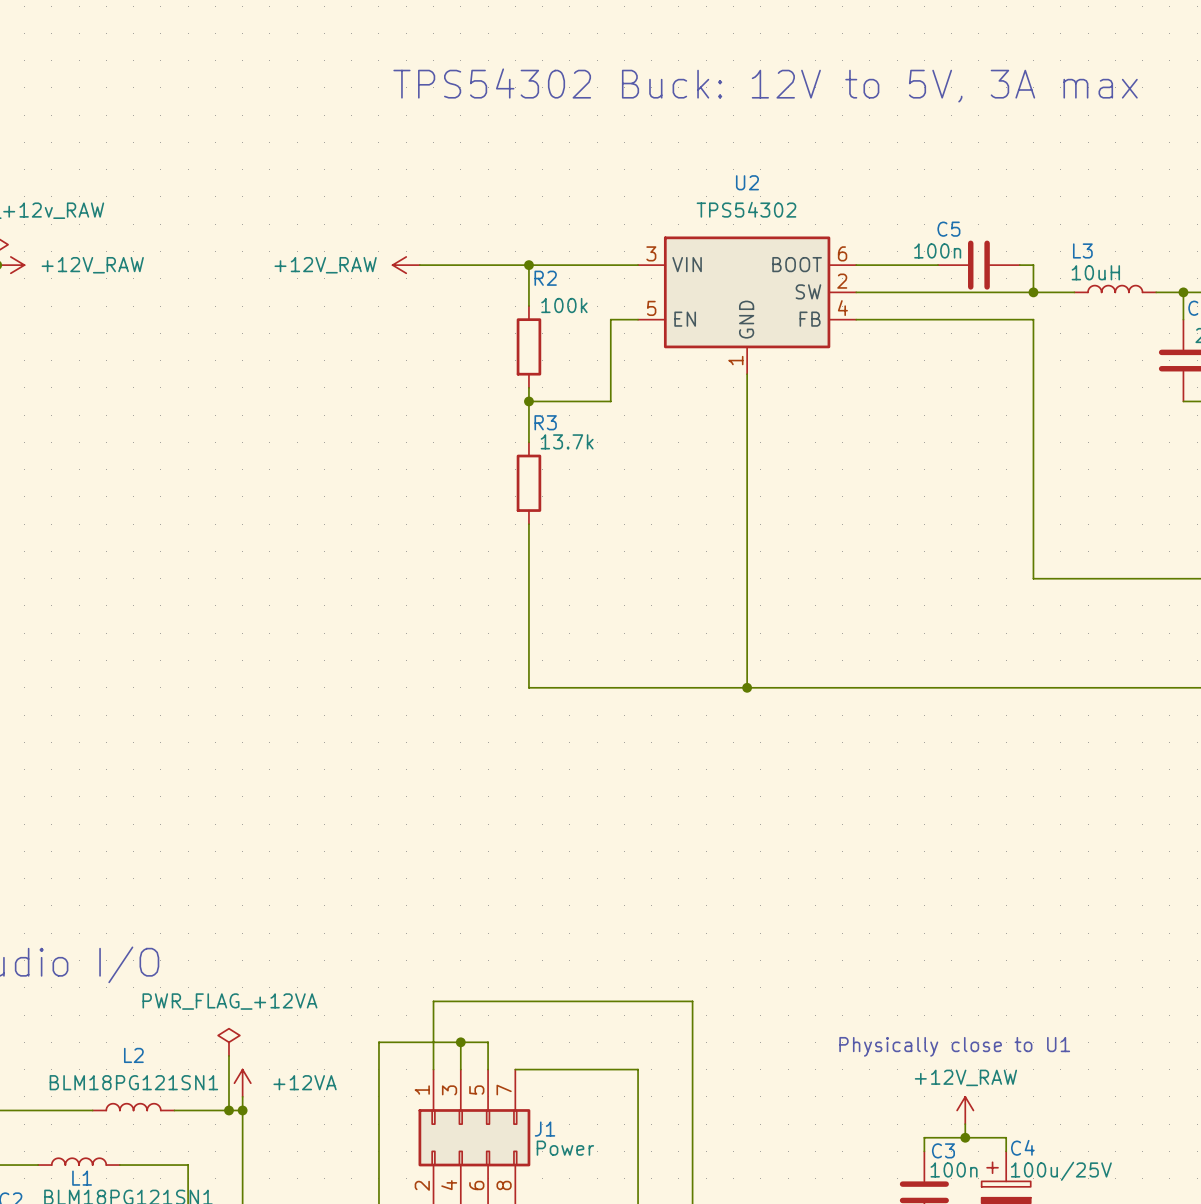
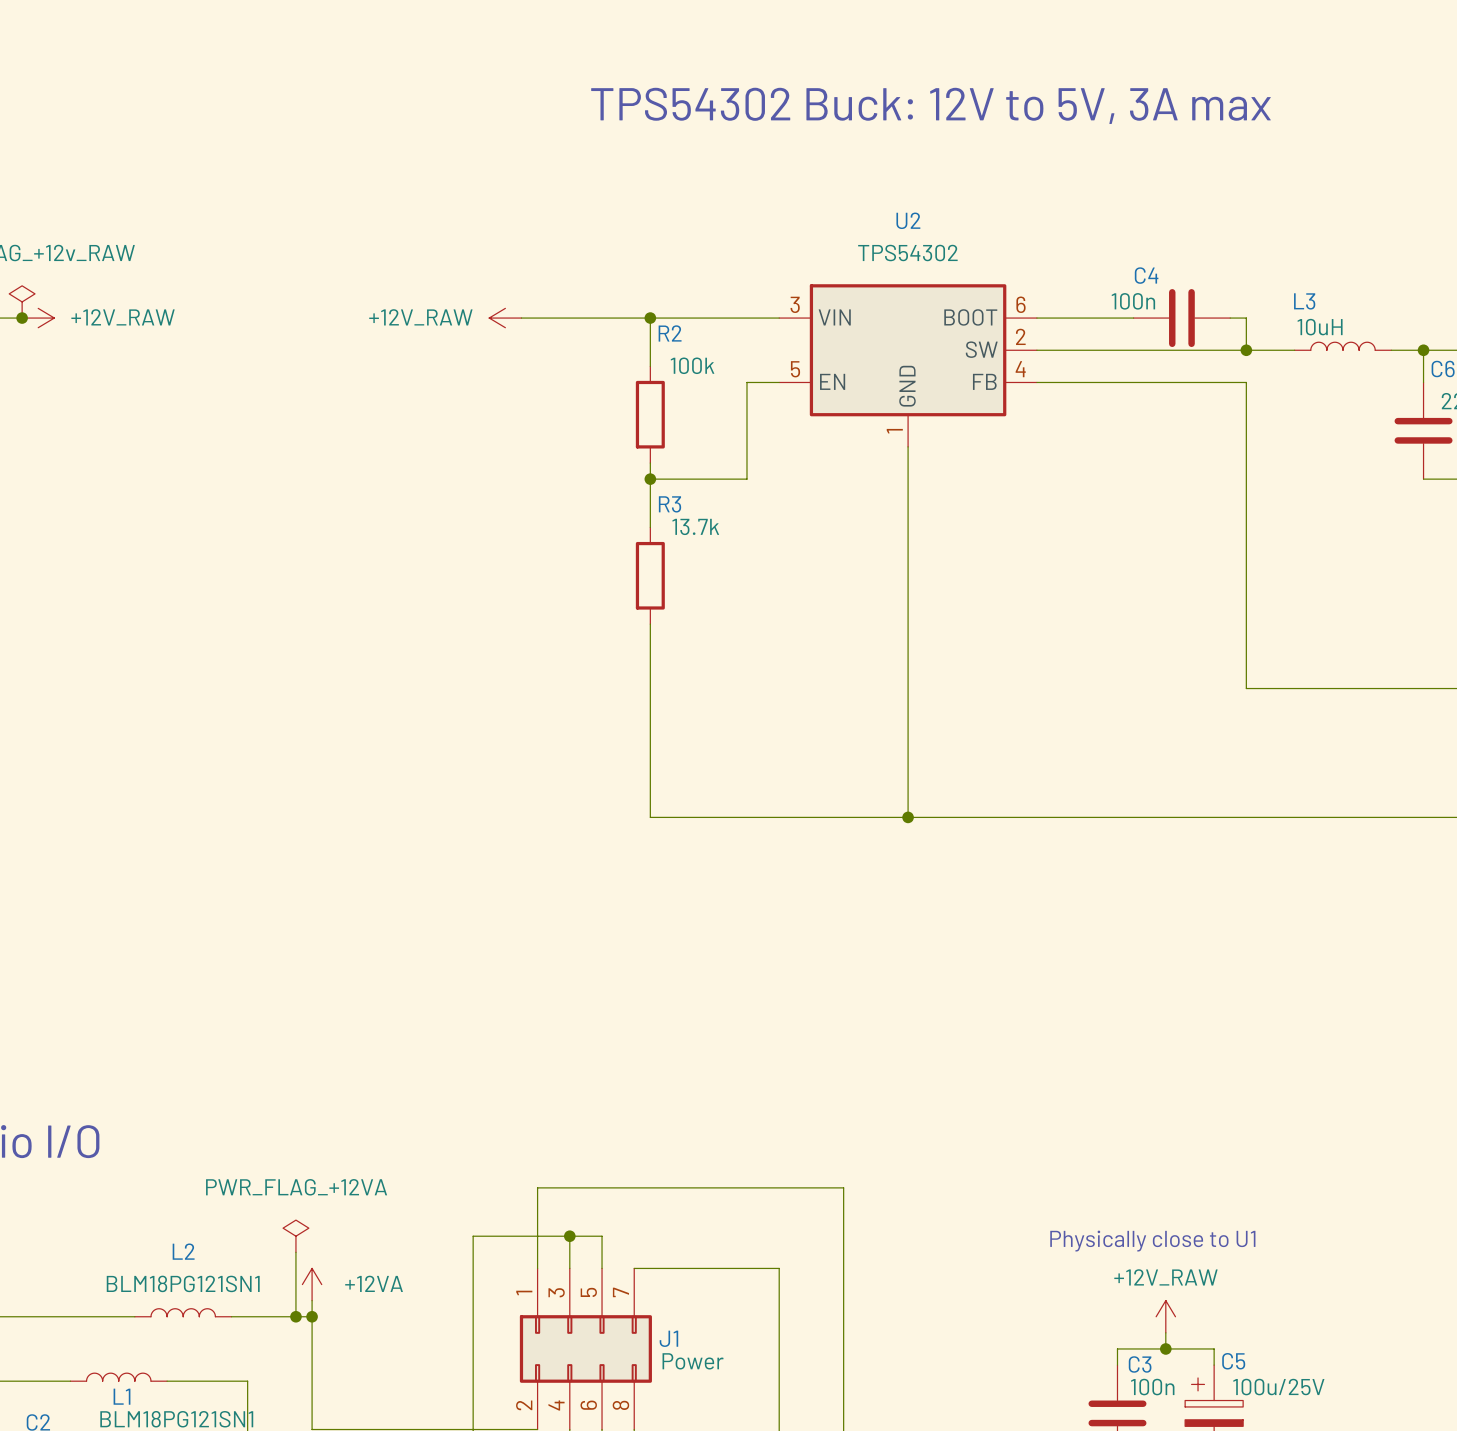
C5 name: C5 (948, 229) -> C4 (1146, 275)
C4 name: C4 (1022, 1147) -> C5 (1233, 1361)

